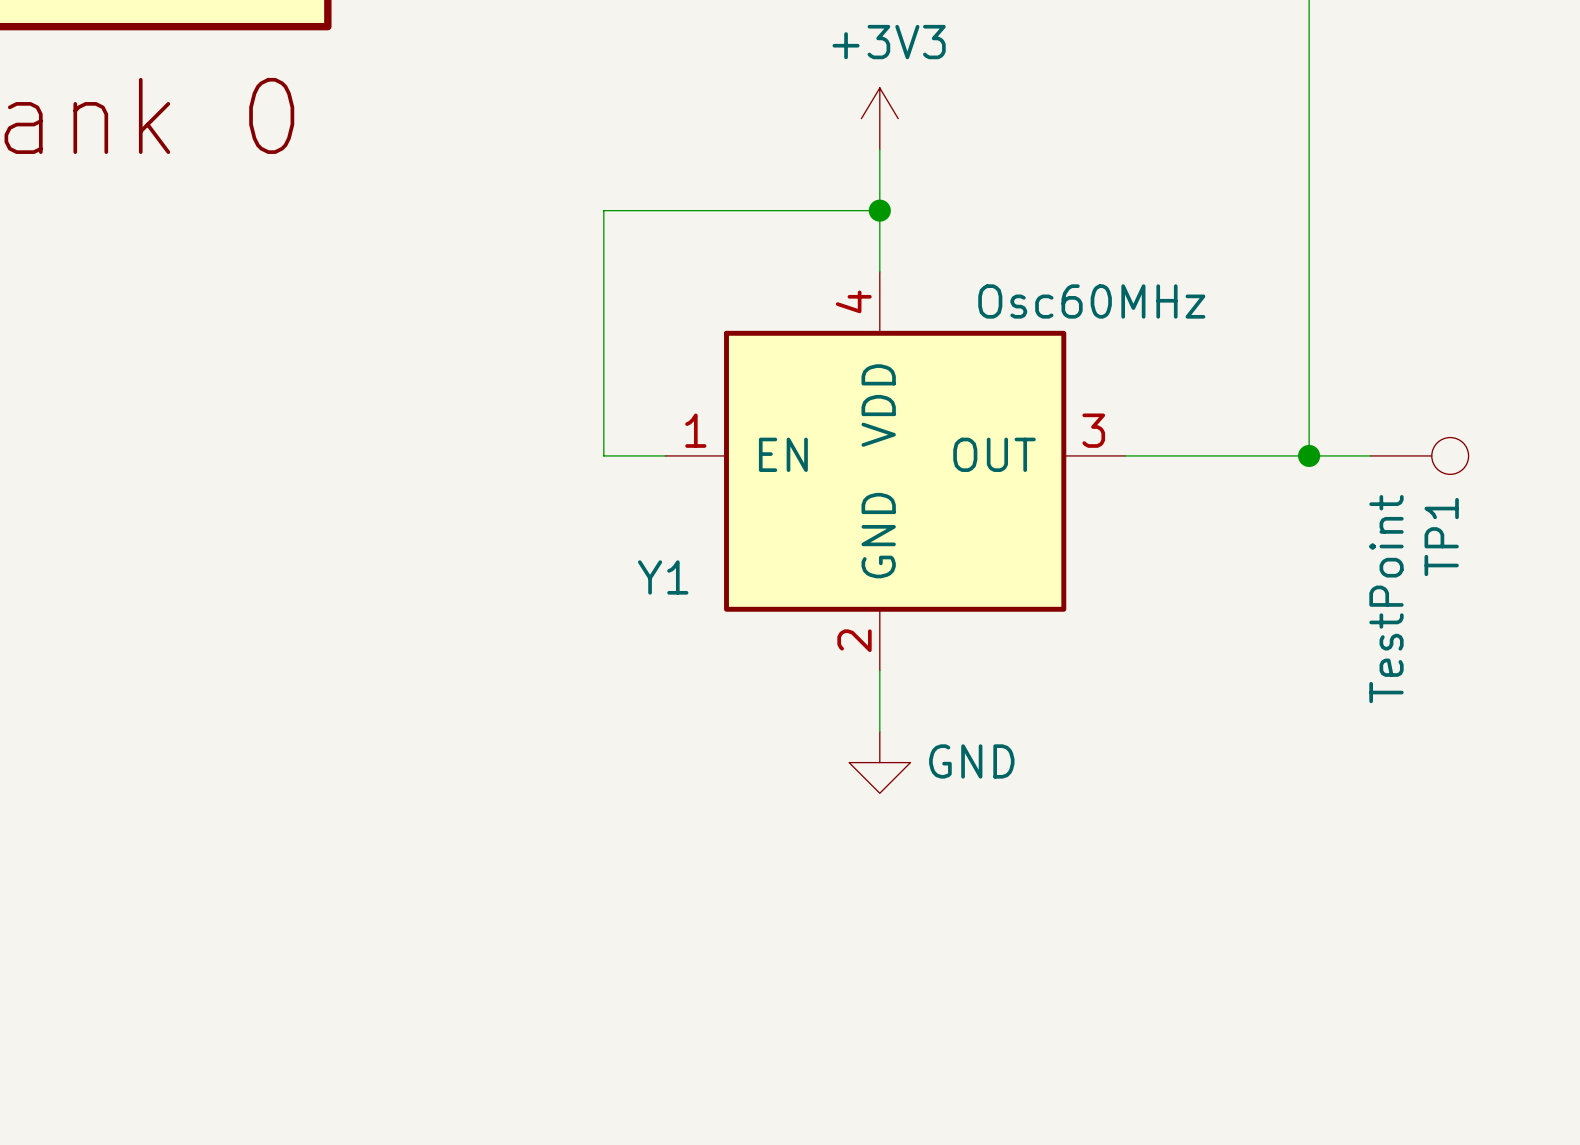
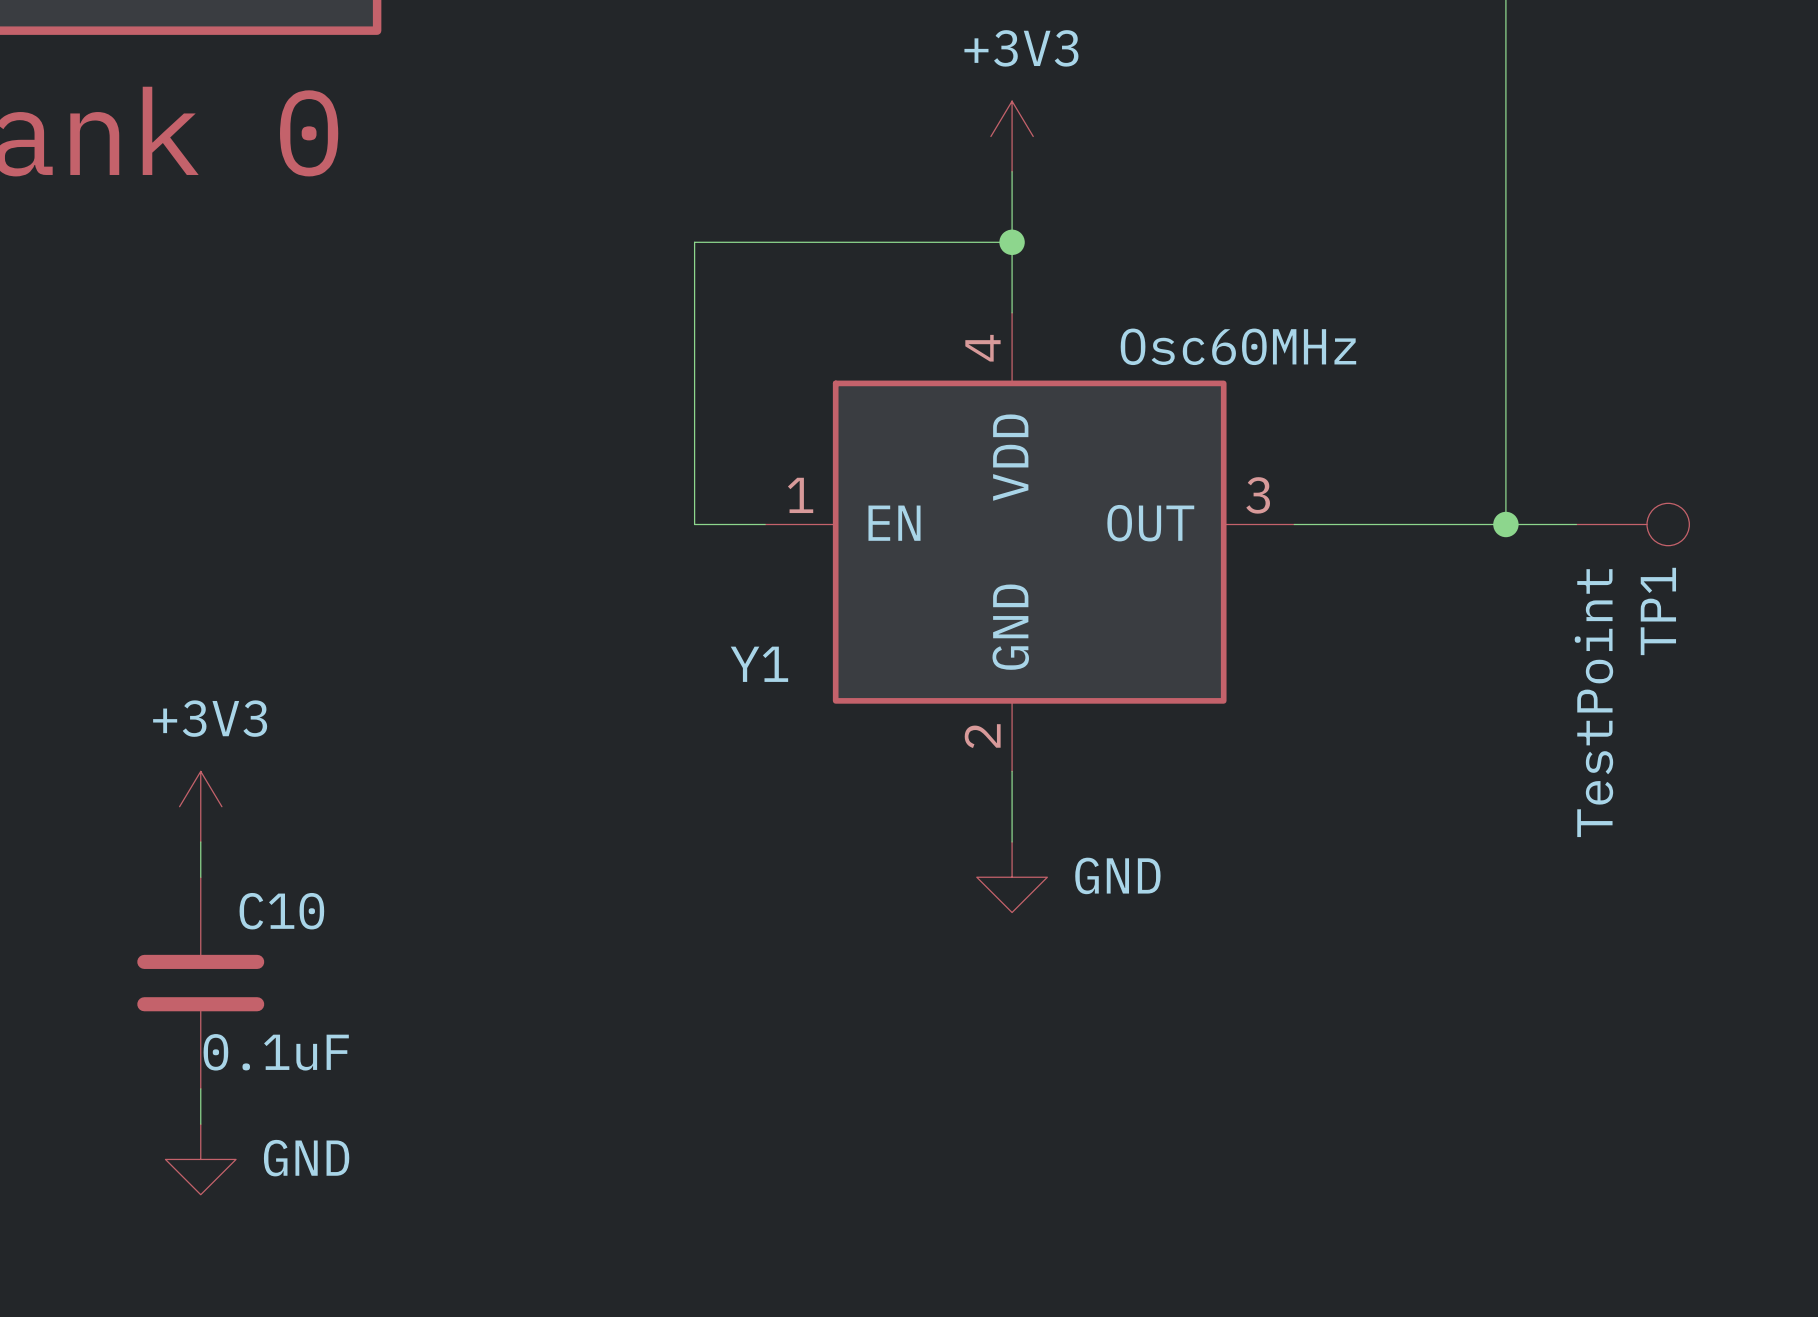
power symbol: none -> +3V3 (200, 806)
wire: none -> (200, 841) (200, 877)
C10: none -> 0.1uF (200, 983)
wire: none -> (200, 1088) (200, 1124)
power symbol: none -> GND (200, 1159)

